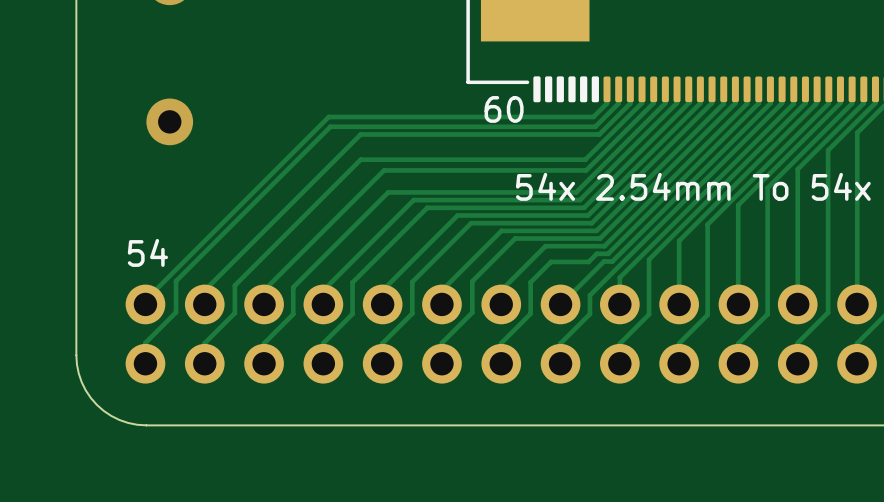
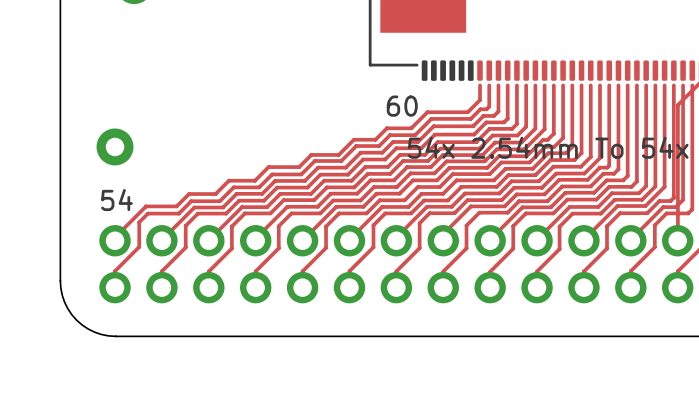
track: (607, 88) (607, 103) (593, 116) (328, 116) (184, 261) -> (480, 85) (480, 100) (467, 112) (427, 112) (411, 128) (386, 128) (375, 139) (353, 139) (338, 154) (311, 154) (299, 167) (268, 167) (254, 180) (228, 180) (215, 194) (189, 194) (176, 206) (146, 206)
track: (618, 88) (618, 103) (595, 126) (330, 126) (187, 270) -> (489, 85) (489, 106) (486, 109) (480, 109) (470, 118) (431, 118) (415, 135) (390, 135) (379, 146) (356, 146) (341, 160) (314, 160) (301, 174) (272, 174) (259, 187) (233, 187) (219, 201) (191, 201) (178, 213) (147, 213)
track: (630, 88) (630, 103) (599, 134) (360, 134) (199, 296) -> none
track: (642, 88) (642, 102) (585, 159) -> (498, 85) (498, 111) (494, 115) (483, 115) (473, 126) (462, 126)
track: (653, 88) (653, 102) (586, 170) (384, 170) (258, 296) -> (516, 85) (516, 124) (512, 128) (489, 128) (476, 142) (437, 142) (424, 154) (400, 154) (388, 166) (365, 166) (351, 180) (324, 180) (311, 193) (280, 193) (267, 207) (242, 207) (215, 234) (204, 234)
track: (665, 88) (665, 103) (576, 192) (388, 192) (293, 287) -> (526, 85) (526, 126) (517, 135) (492, 135) (479, 148) (440, 148) (427, 160) (403, 160) (390, 173) (367, 173) (354, 187) (326, 187) (314, 200) (283, 200) (270, 213) (244, 213) (231, 227)
track: (677, 88) (677, 102) (579, 200) (413, 200) (317, 296) -> (535, 85) (535, 128) (521, 142) (495, 142) (482, 155) (442, 155) (430, 167) (407, 167) (393, 180) (370, 180) (357, 193) (330, 193) (317, 206) (287, 206) (260, 234) (251, 234)
track: (700, 88) (700, 103) (588, 215) (457, 215) (377, 296) -> (553, 85) (553, 133) (547, 139) (542, 139) (526, 156) (499, 156) (487, 167) (449, 167) (436, 180) (412, 180) (399, 193) (376, 193) (363, 206) (336, 206) (309, 234) (298, 234)
track: (712, 88) (712, 102) (591, 223) (471, 223) (412, 282) (412, 286) -> (563, 85) (563, 138) (554, 146) (545, 146) (529, 162) (501, 162) (489, 174) (452, 174) (439, 187) (417, 187) (404, 200) (379, 200) (366, 213) (339, 213) (326, 226)
track: (723, 88) (723, 103) (596, 230) (501, 230) (436, 296) -> (572, 85) (572, 146) (566, 153) (548, 153) (532, 168) (505, 168) (494, 180) (456, 180) (443, 193) (421, 193) (408, 206) (382, 206) (355, 234) (345, 234)
track: (735, 88) (735, 103) (600, 238) (515, 238) (472, 281) (472, 284) -> (581, 85) (581, 153) (574, 160) (550, 160) (535, 175) (508, 175) (496, 186) (461, 186) (447, 200) (424, 200) (411, 213) (385, 213) (373, 225)
track: (758, 88) (758, 103) (608, 253) (596, 253) (588, 261) (551, 261) (543, 269) -> (600, 85) (600, 158) (584, 173) (556, 173) (542, 187) (514, 187) (501, 200) (467, 200) (454, 213) (429, 213)
track: (770, 88) (770, 103) (612, 261) (603, 261) (560, 304) -> (609, 85) (609, 165) (607, 167) (599, 167) (587, 179) (559, 179) (544, 194) (516, 194) (504, 206) (470, 206) (443, 234) (443, 241)
track: (782, 88) (782, 103) (589, 295) -> (618, 85) (618, 169) (614, 173) (603, 173) (590, 186) (562, 186) (547, 201) (519, 201) (507, 212) (479, 212) (466, 225) (466, 233)
track: (793, 88) (793, 103) (619, 277) (619, 303) -> (627, 85) (627, 175) (623, 180) (606, 180) (594, 192) (565, 192) (550, 207) (522, 207) (490, 239)
track: (805, 88) (805, 103) (649, 259) (649, 286) -> (636, 85) (636, 181) (631, 186) (609, 186) (596, 199) (567, 199) (553, 213) (525, 213) (513, 226)
track: (817, 88) (815, 104) (679, 240) (679, 303) -> (646, 85) (646, 186) (638, 193) (612, 193) (598, 206) (569, 206) (537, 239)
track: (828, 88) (828, 103) (707, 224) (707, 286) -> (655, 85) (655, 186) (642, 199) (614, 199) (600, 213) (572, 213) (559, 226)
track: (840, 88) (840, 102) (738, 205) (738, 303) -> (664, 85) (664, 186) (645, 206) (617, 206) (583, 239)
track: (852, 88) (852, 103) (767, 187) (767, 286) -> (673, 85) (673, 197) (670, 201) (659, 201) (647, 213) (620, 213) (607, 226)
track: (863, 88) (863, 103) (797, 169) (797, 303) -> (683, 85) (683, 199) (675, 207) (663, 207) (630, 239)
track: (875, 88) (875, 102) (828, 150) (828, 284) -> (692, 85) (692, 209) (688, 213) (666, 213) (654, 225)
track: (748, 90) (747, 89) (747, 103) (604, 246) (545, 246) (495, 296) -> (590, 85) (590, 156) (580, 166) (553, 166) (538, 181) (511, 181) (499, 193) (465, 193) (451, 206) (427, 206) (399, 234) (391, 234)
track: (689, 94) (689, 102) (584, 207) (427, 207) (352, 282) (352, 286) -> (544, 85) (544, 129) (524, 149) (496, 149) (484, 161) (446, 161) (434, 173) (410, 173) (396, 187) (374, 187) (360, 200) (333, 200) (320, 213) (291, 213) (278, 226)
track: none -> (507, 85) (507, 118) (504, 122) (486, 122) (474, 134) (434, 134) (421, 148) (396, 148) (385, 159) (363, 159) (348, 174) (320, 174) (307, 187) (277, 187) (264, 200) (239, 200) (226, 213) (197, 213)
text position: 60 (504, 109) -> 60 (402, 106)
via position: (169, 121) -> (115, 146)
track: (548, 159) (360, 159) (250, 270) -> (433, 126) (417, 141) (393, 141) (382, 152) (360, 152) (345, 167) (318, 167) (304, 180) (275, 180) (262, 193) (236, 193) (223, 207) (194, 207) (167, 234) (157, 234)

